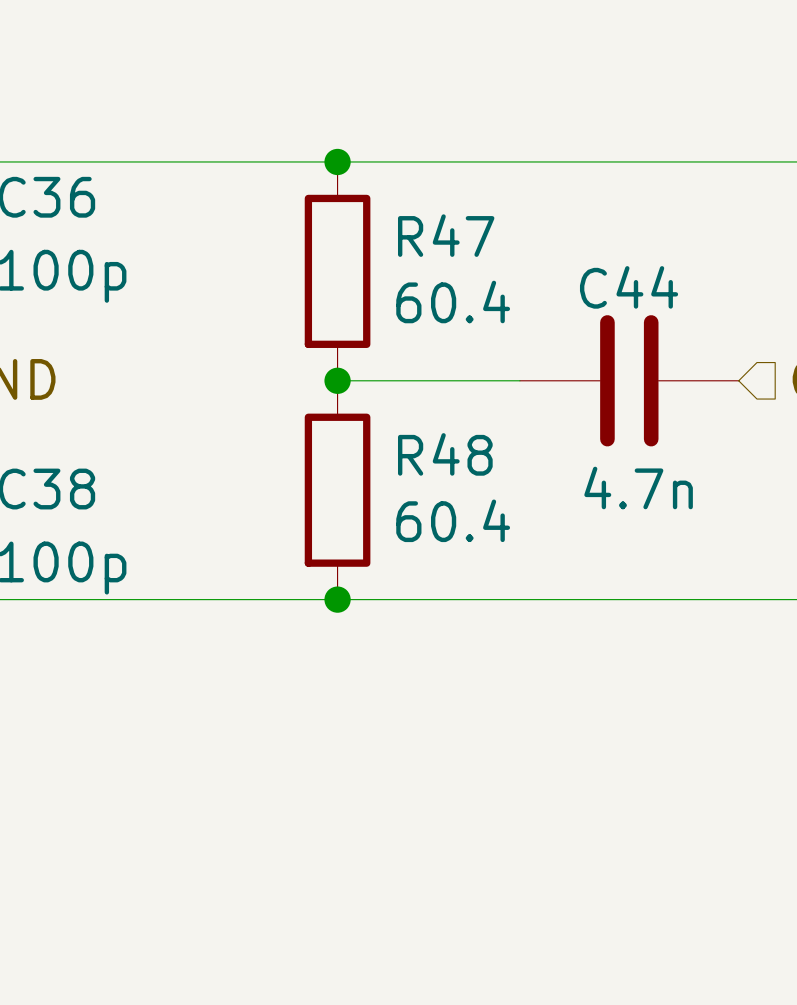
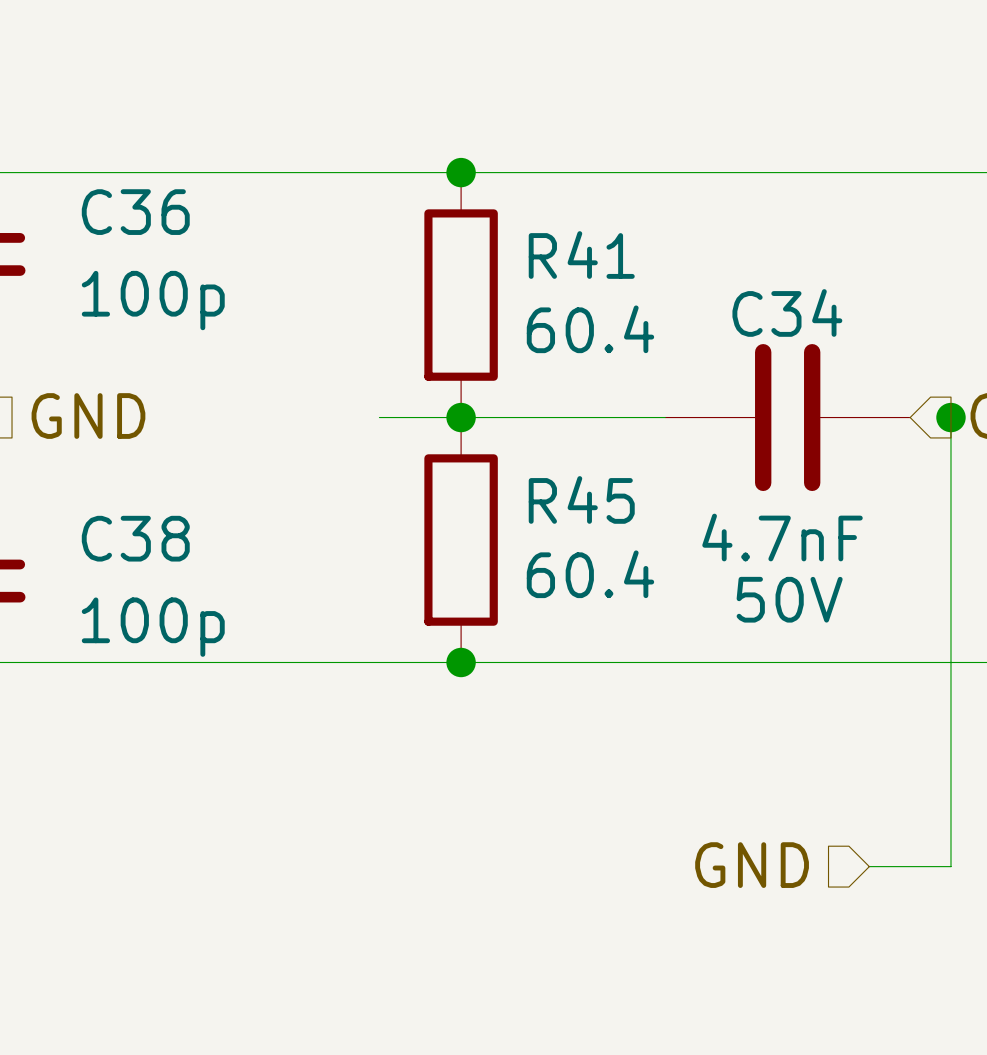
R47 name: R47 (446, 235) -> R41 (581, 255)
C44 name: C44 (629, 287) -> C34 (787, 312)
wire: none -> (379, 417) (461, 417)
wire: none -> (950, 417) (950, 866) (869, 866)
junction: none -> (950, 417)
R48 name: R48 (445, 454) -> R45 (581, 499)
C44 value: 4.7n (638, 487) -> 4.7nF (782, 537)
C44 text: none -> 50V (789, 599)
hierarchical label: none -> GND (752, 865)

